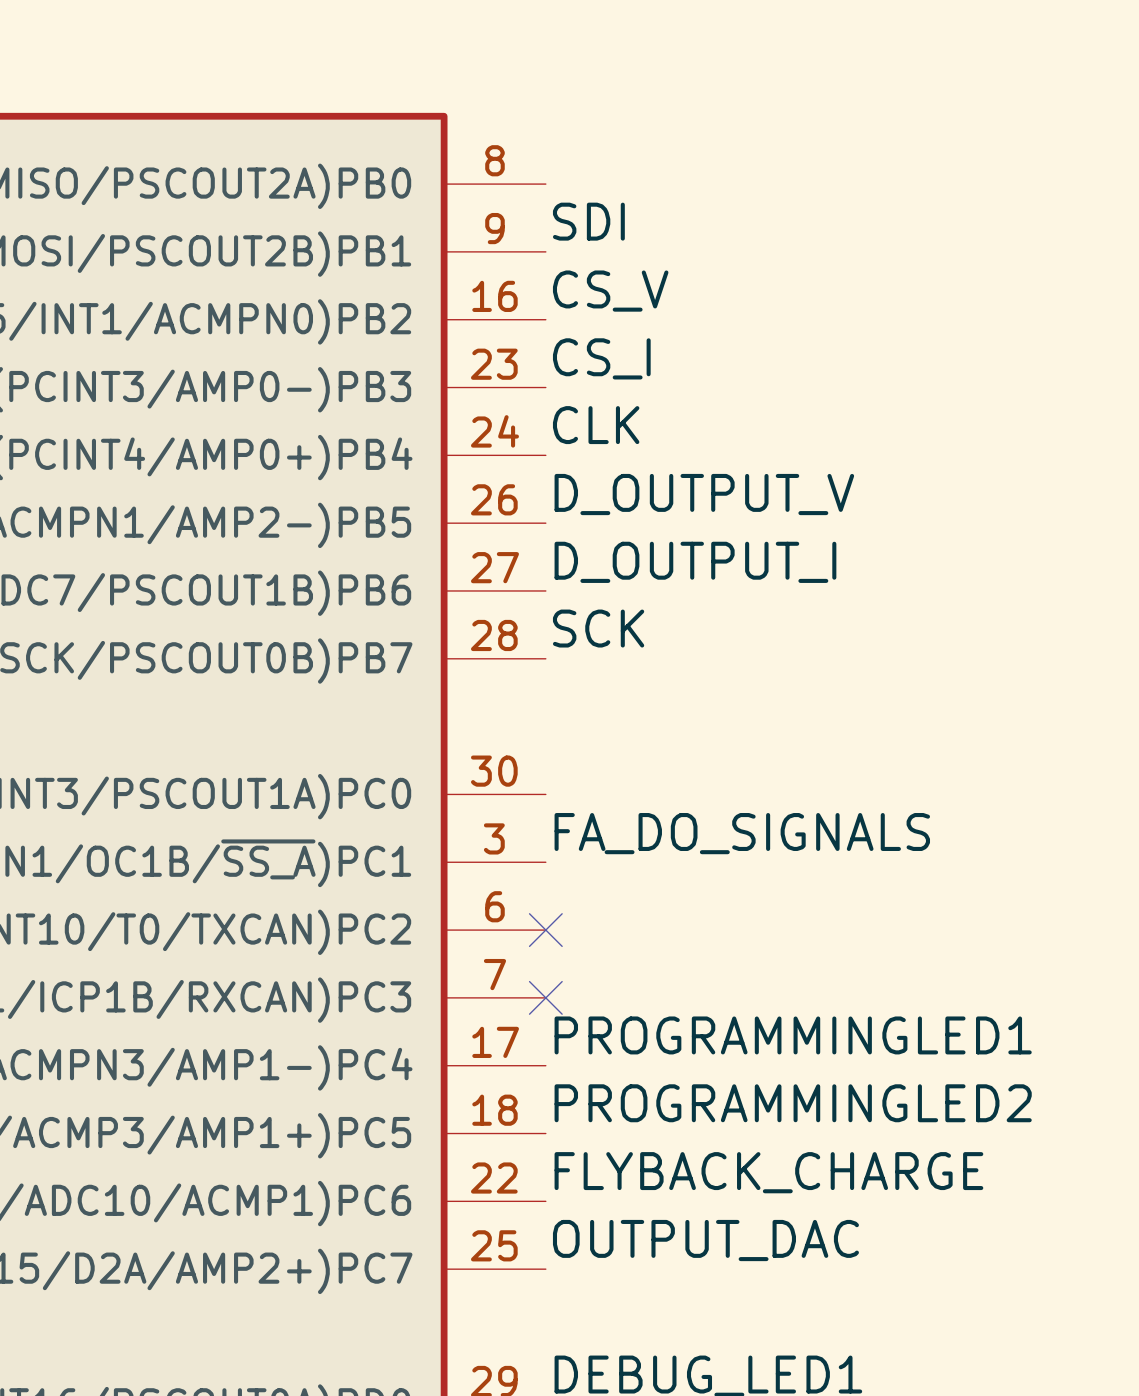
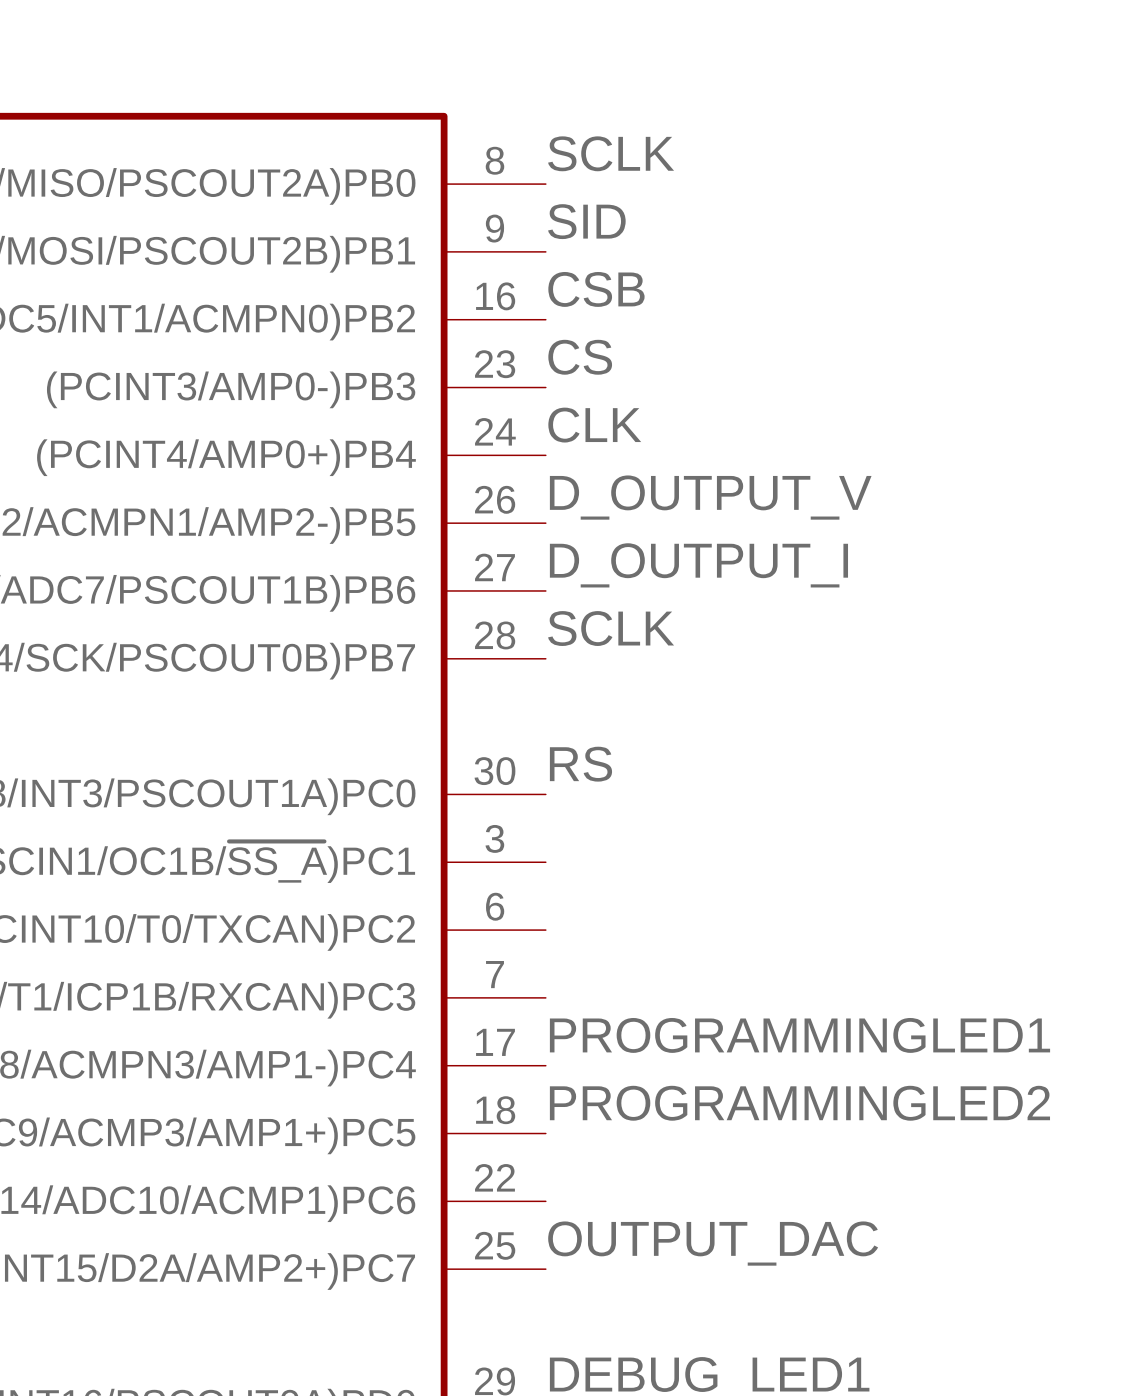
label: none -> SCLK (611, 153)
label: SDI (588, 221) -> SID (586, 221)
label: CS_V (610, 291) -> CSB (596, 289)
label: CS_I (601, 358) -> CS (580, 357)
label: SCK (598, 628) -> SCLK (611, 628)
label: none -> RS (580, 764)
label: FA_DO_SIGNALS (742, 833) -> none
no-connect mark: (545, 930) -> none
no-connect mark: (545, 997) -> none
label: FLYBACK_CHARGE (768, 1172) -> none

